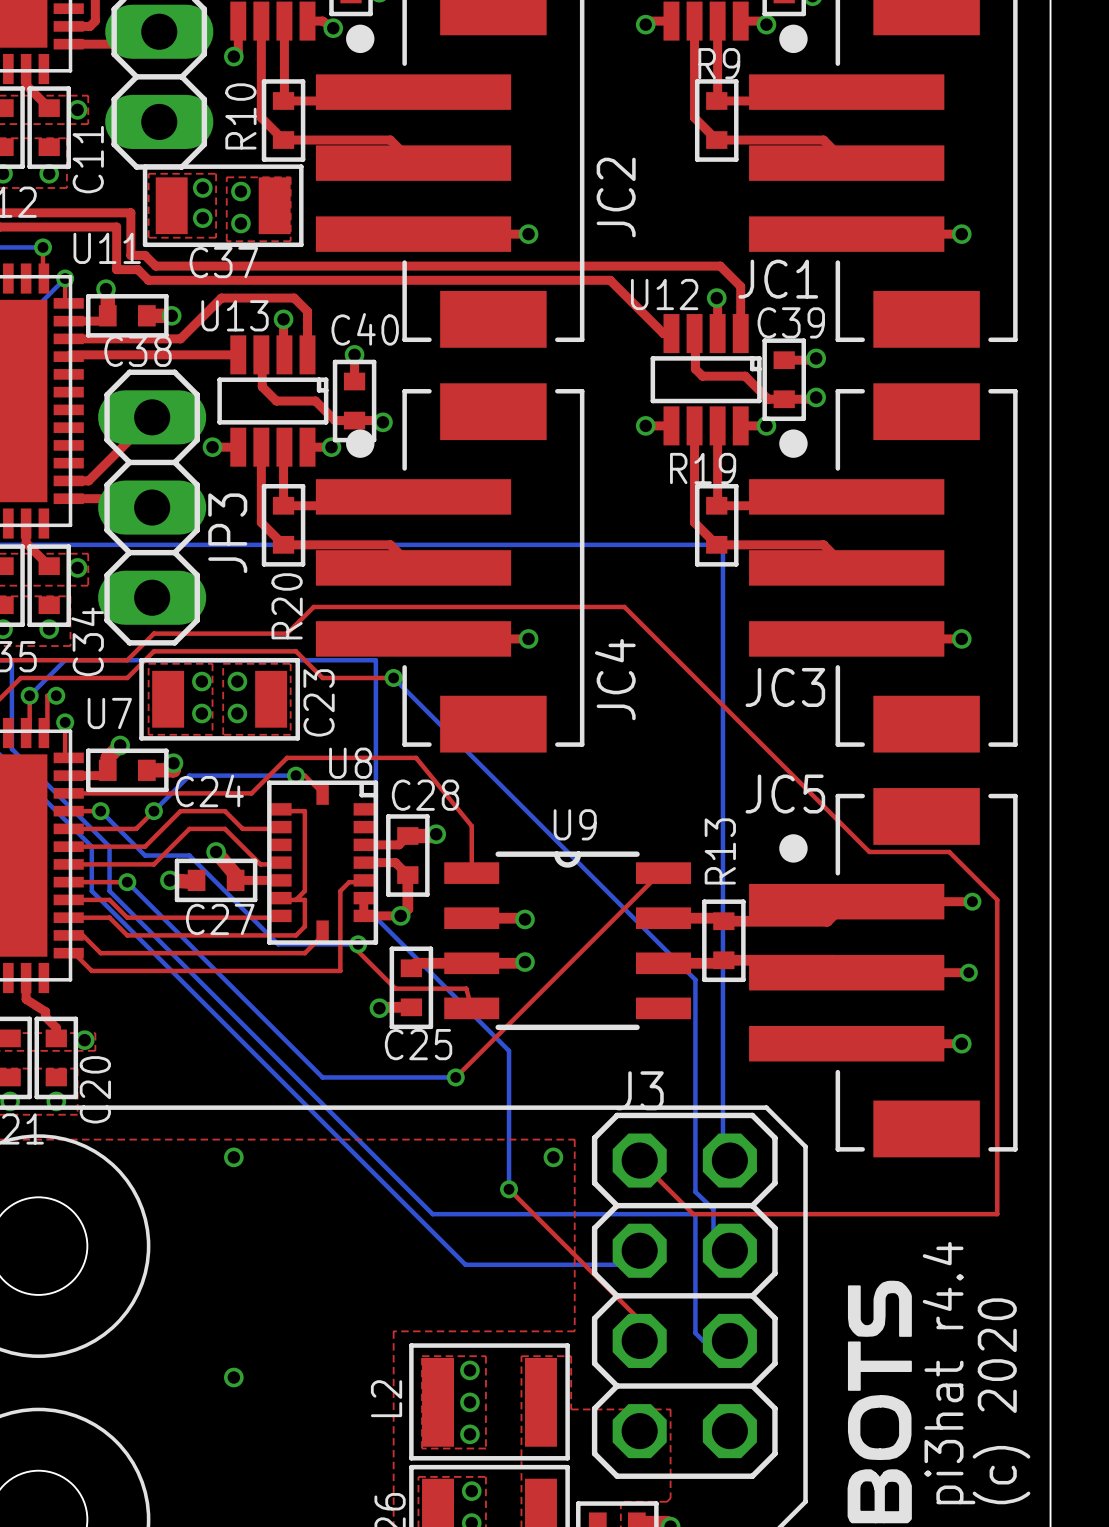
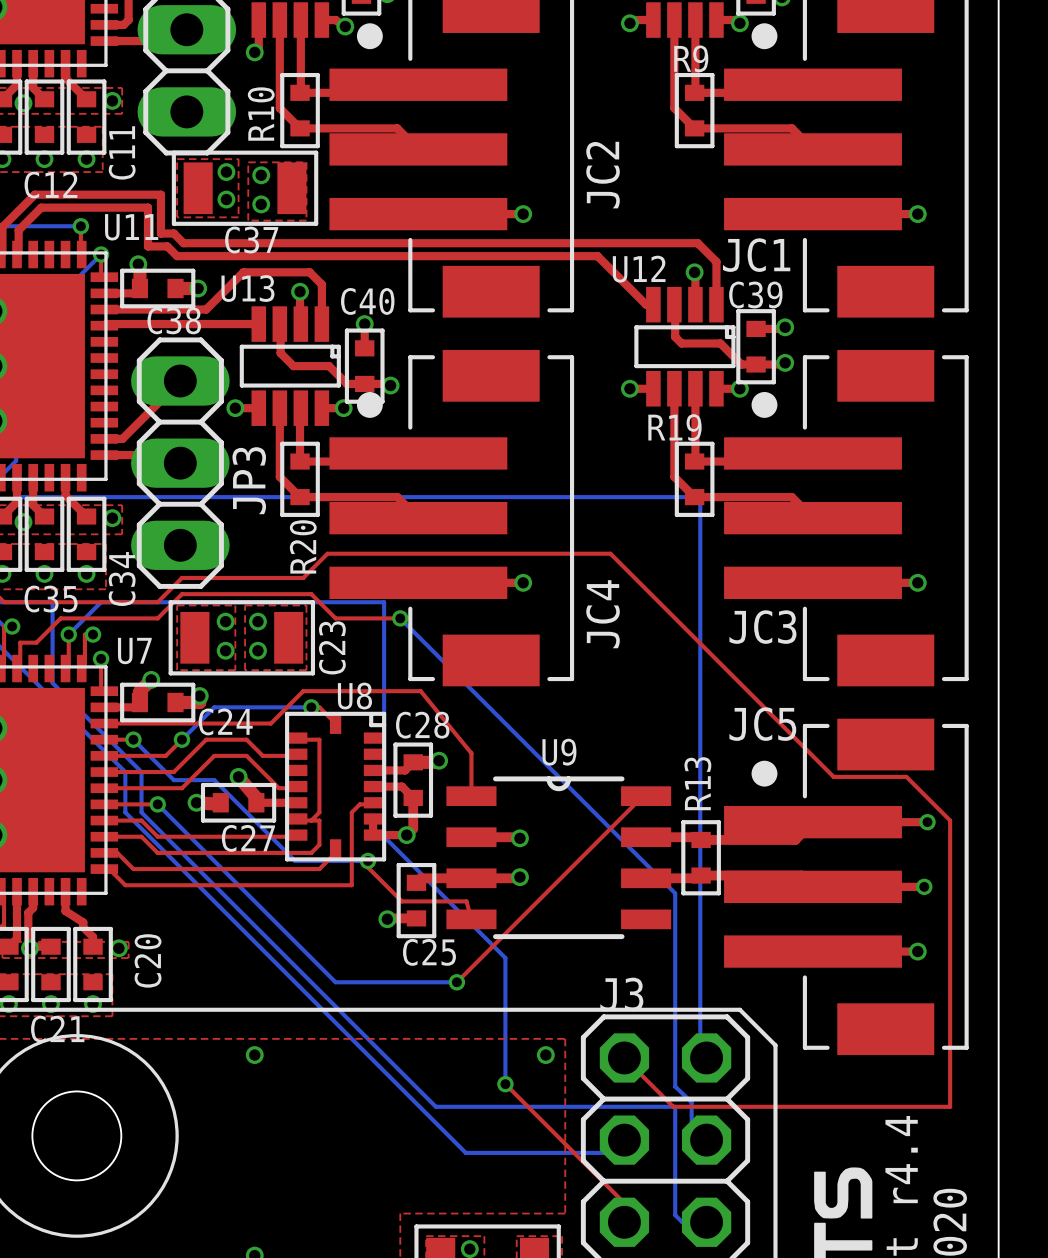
C20 name position: C20 (95, 1089) -> C20 (148, 960)

